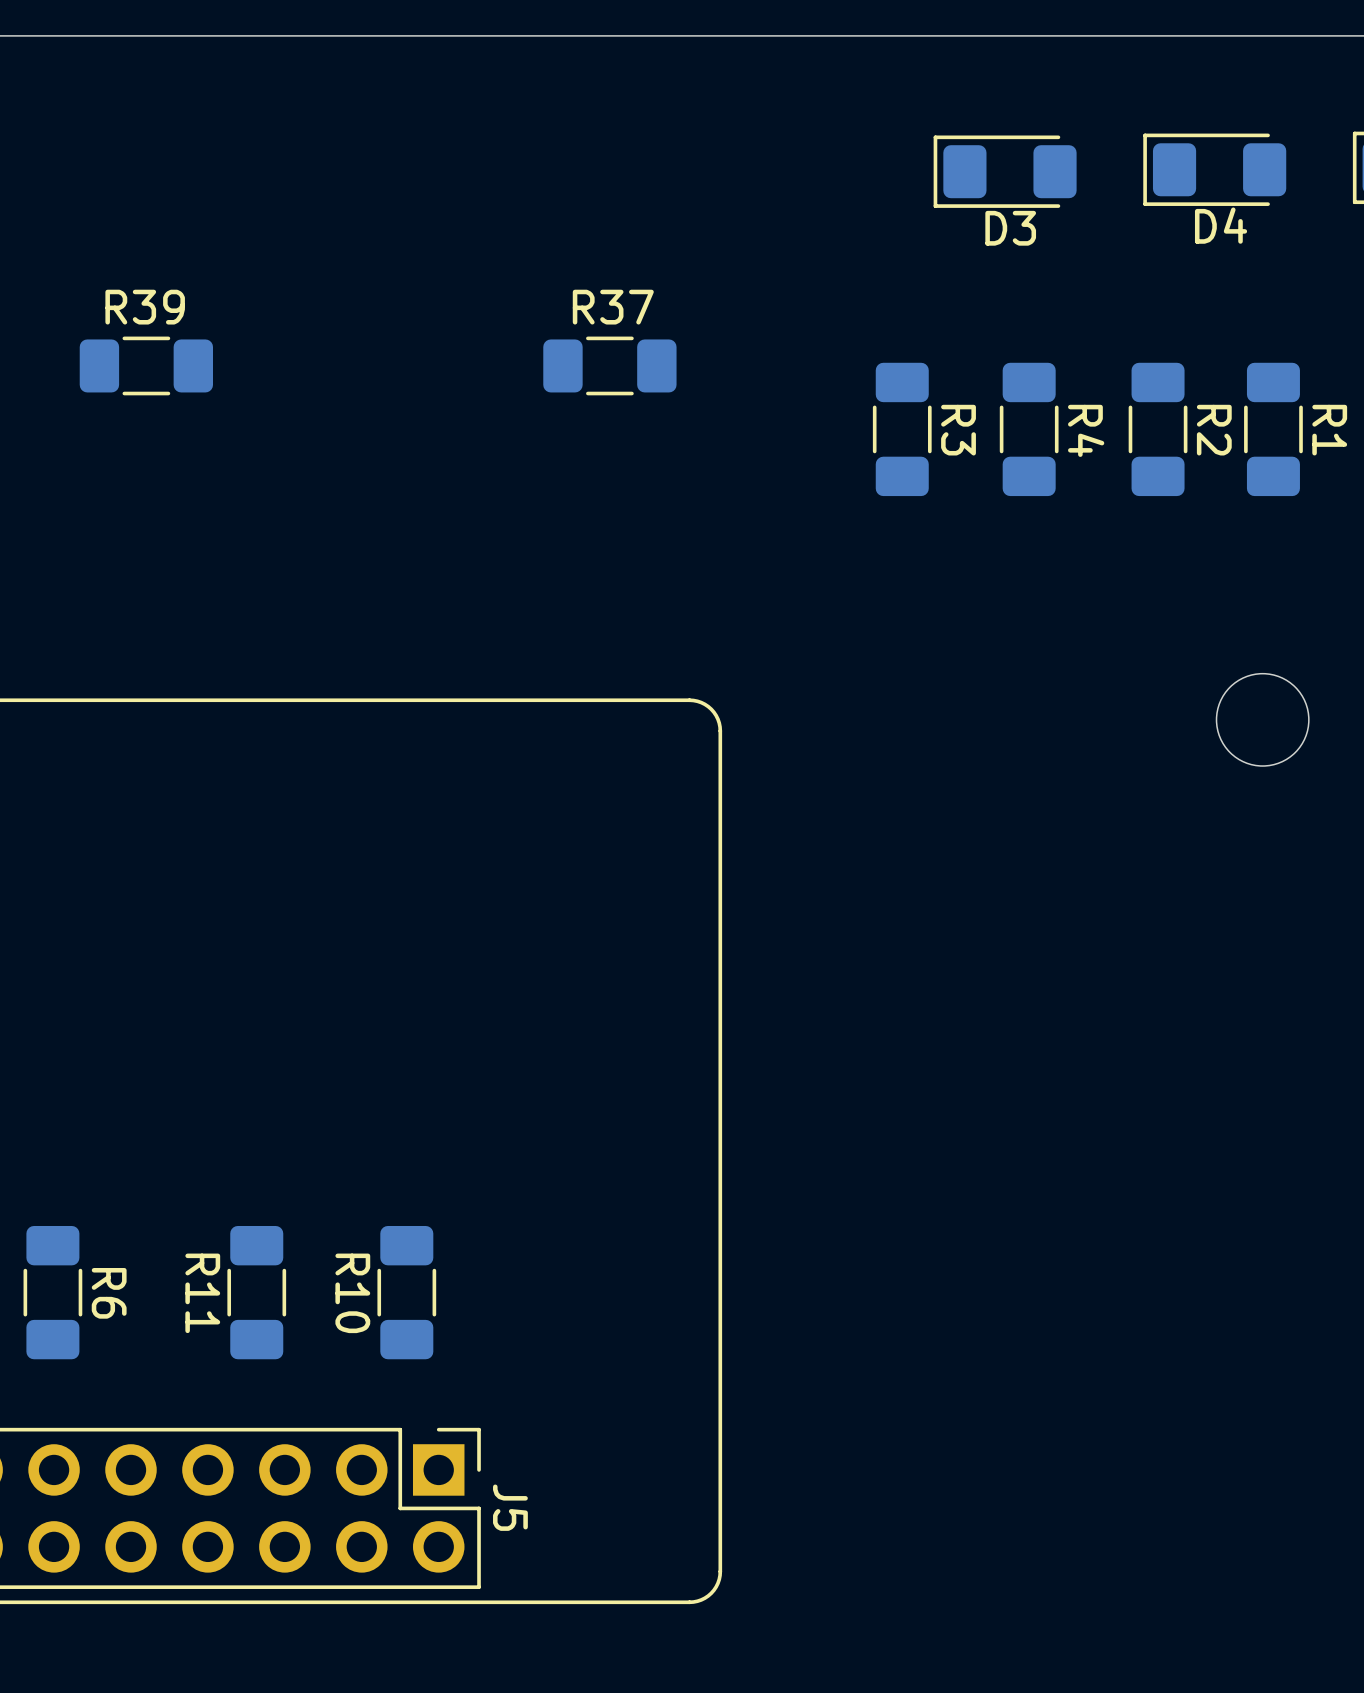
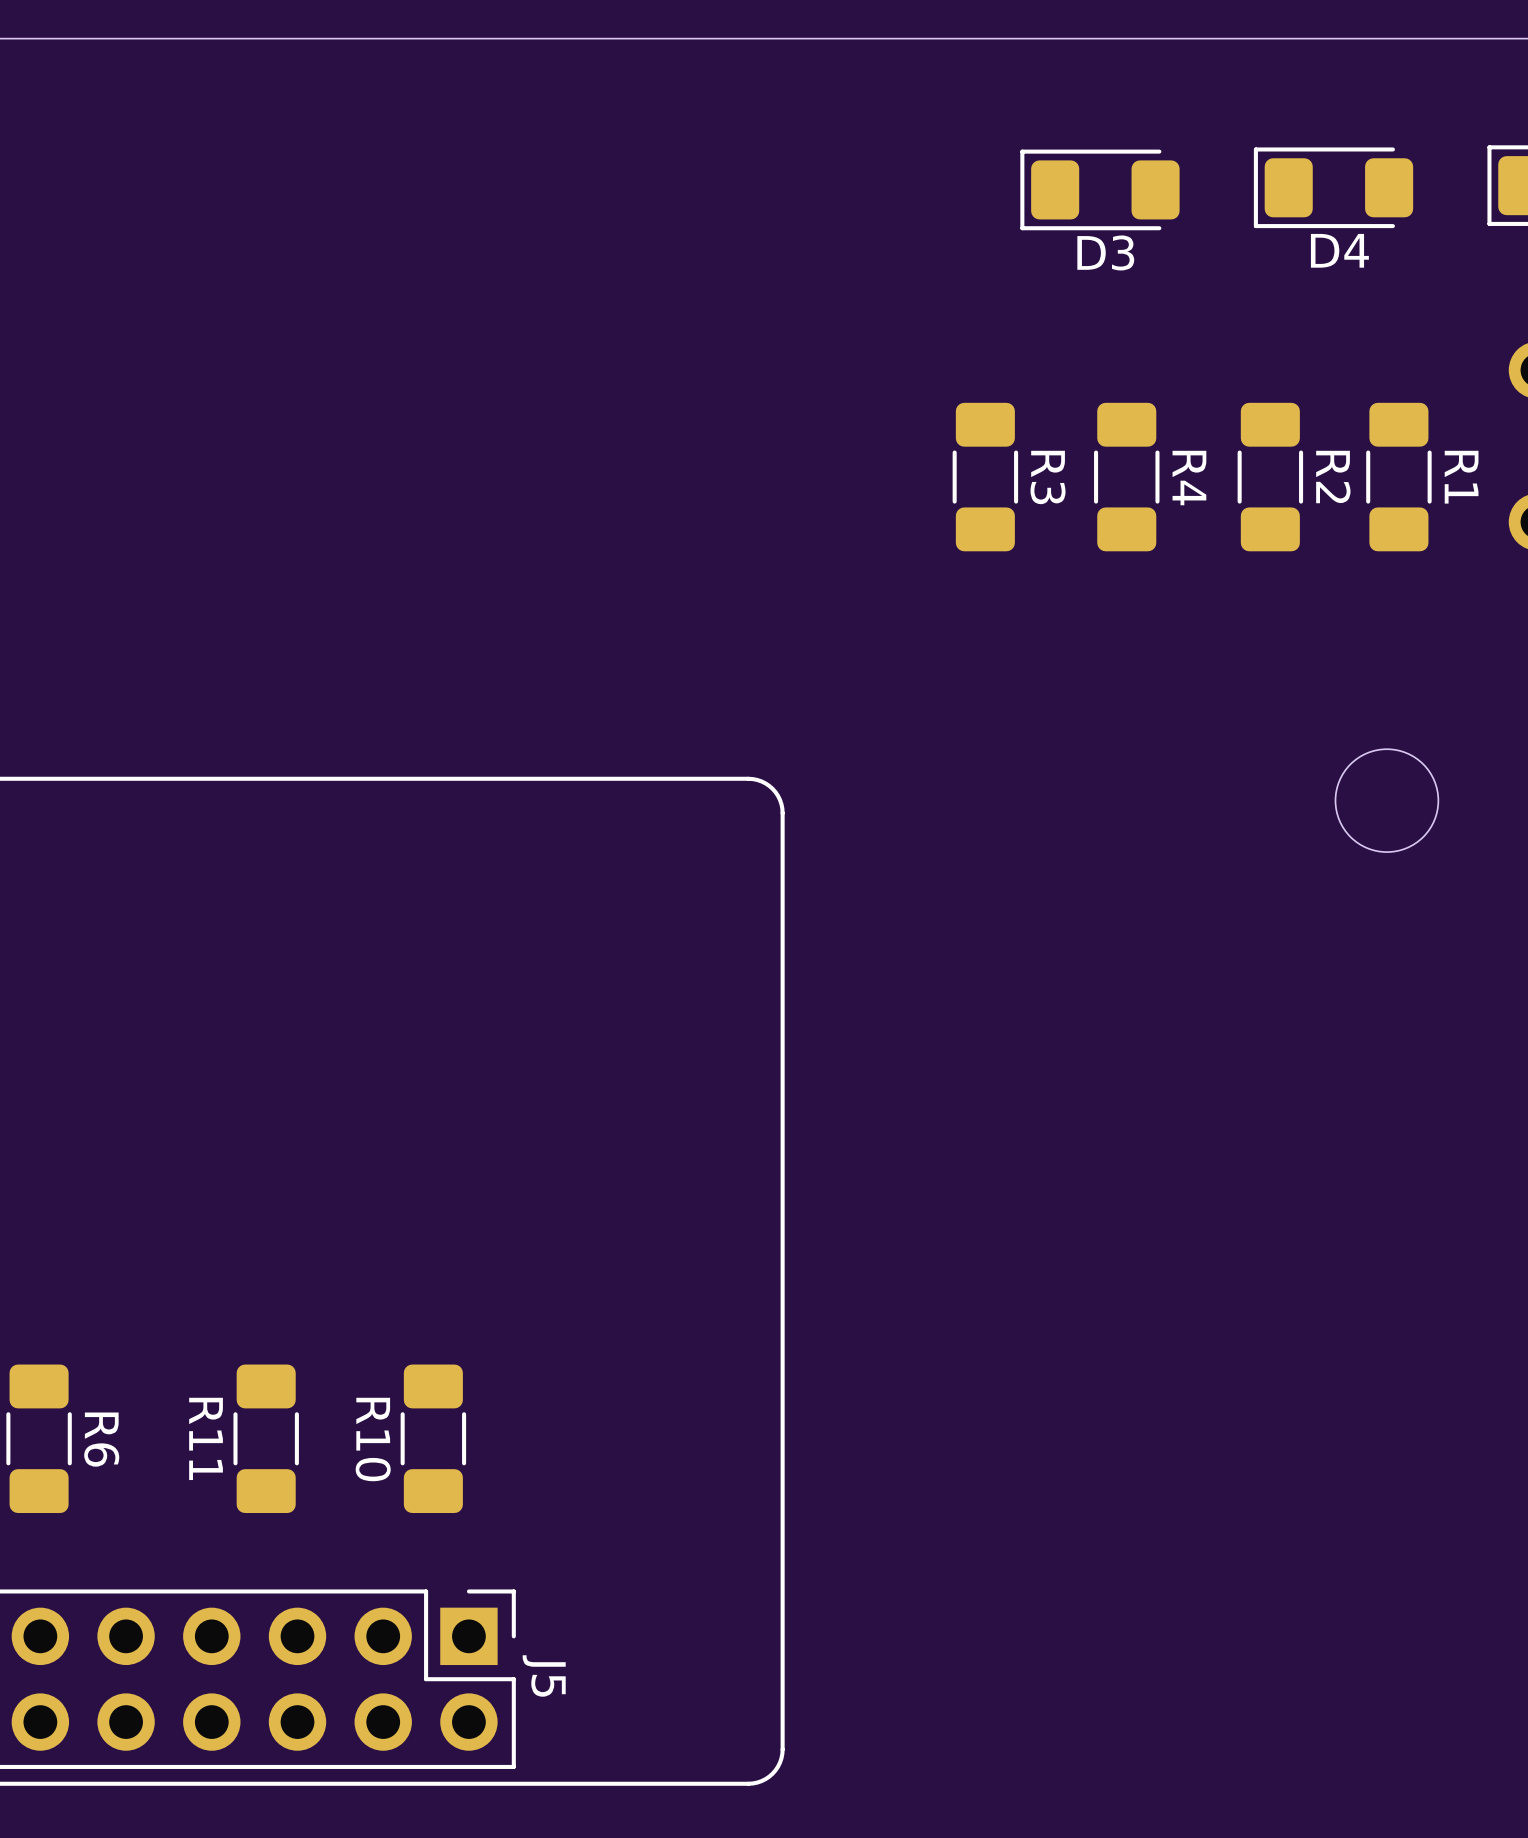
R39: (146, 365) -> none
R37: (609, 365) -> none

